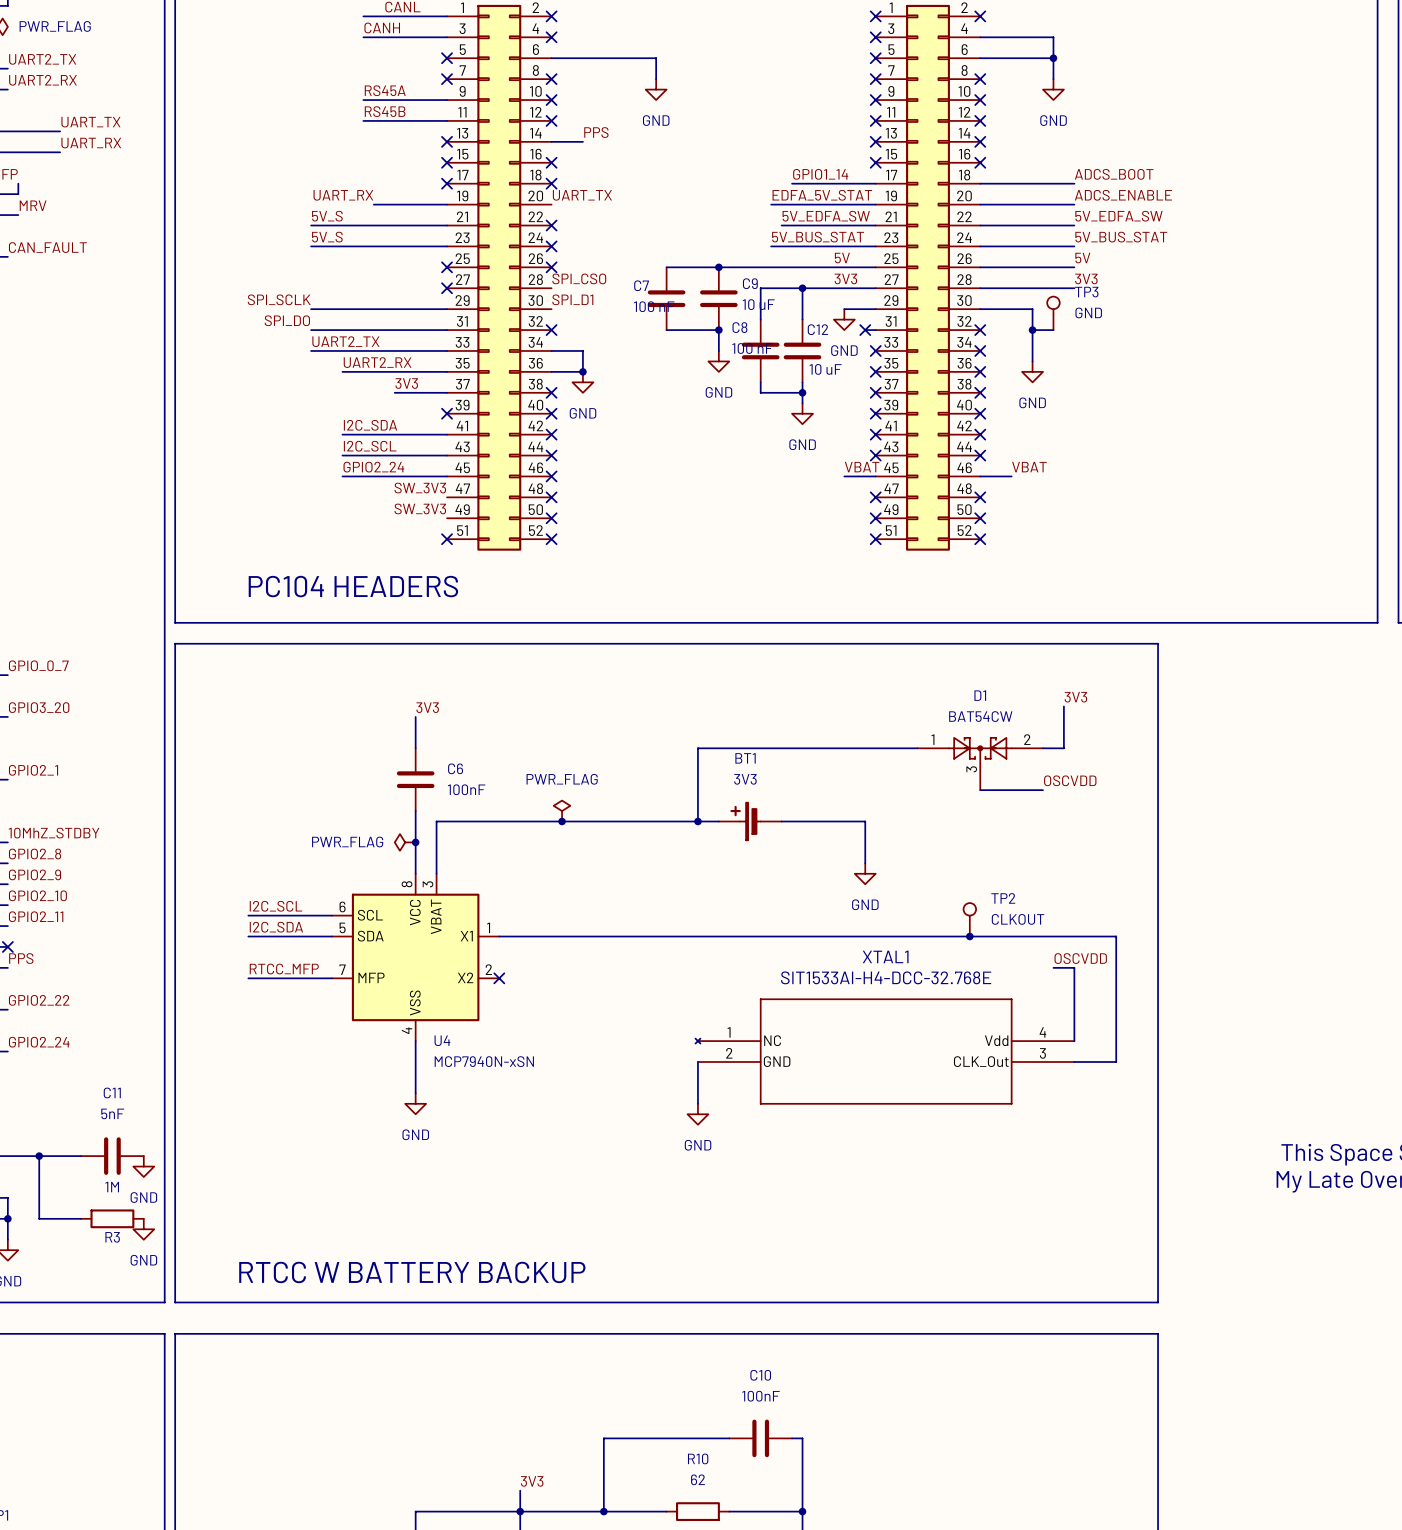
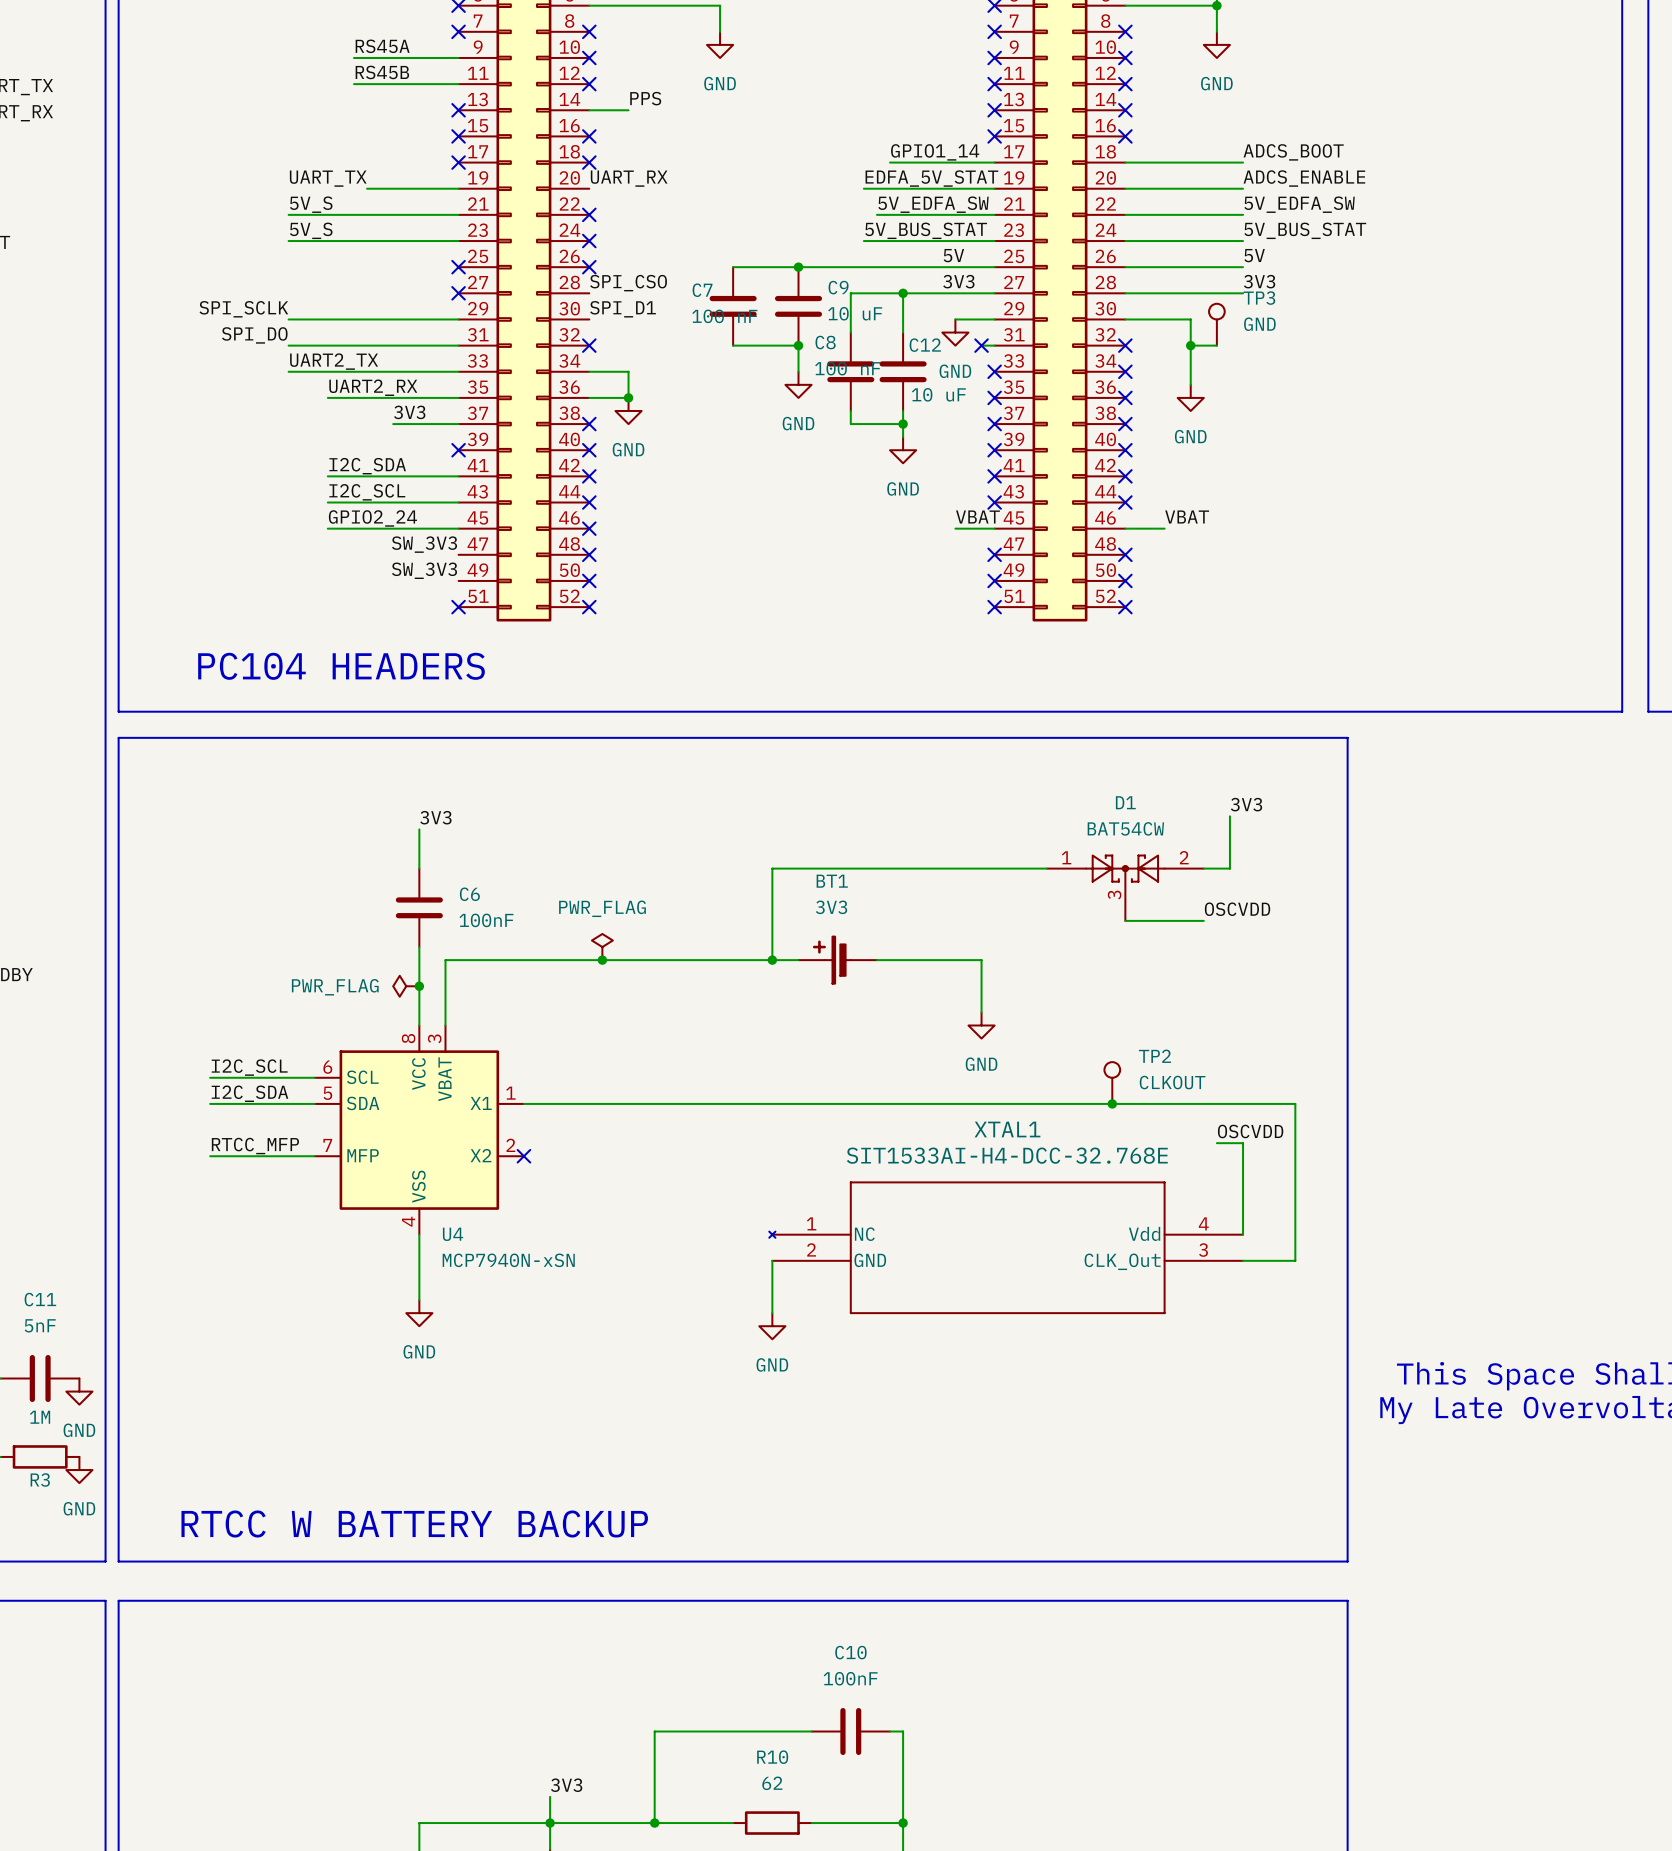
label: UART_RX (343, 195) -> UART_TX (328, 178)
label: UART_TX (582, 195) -> UART_RX (629, 178)

